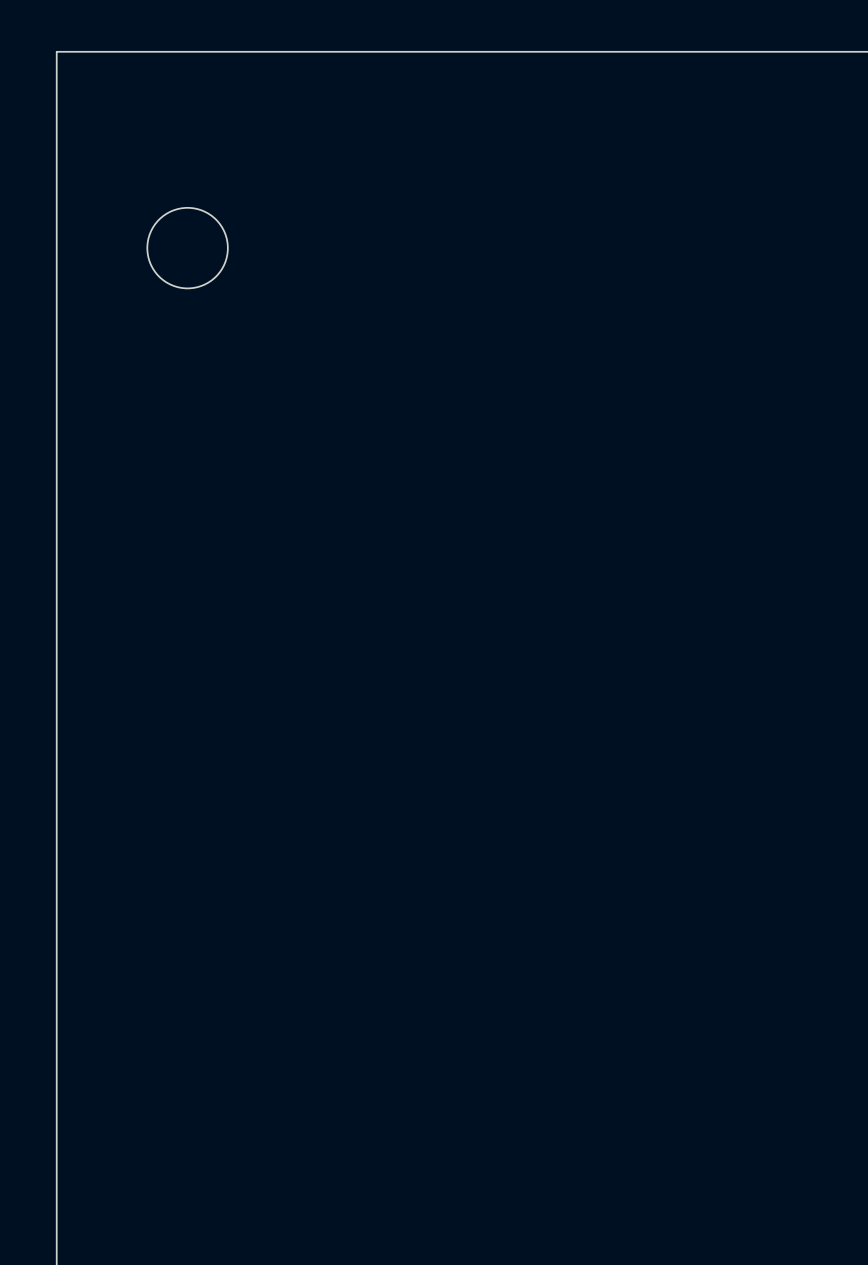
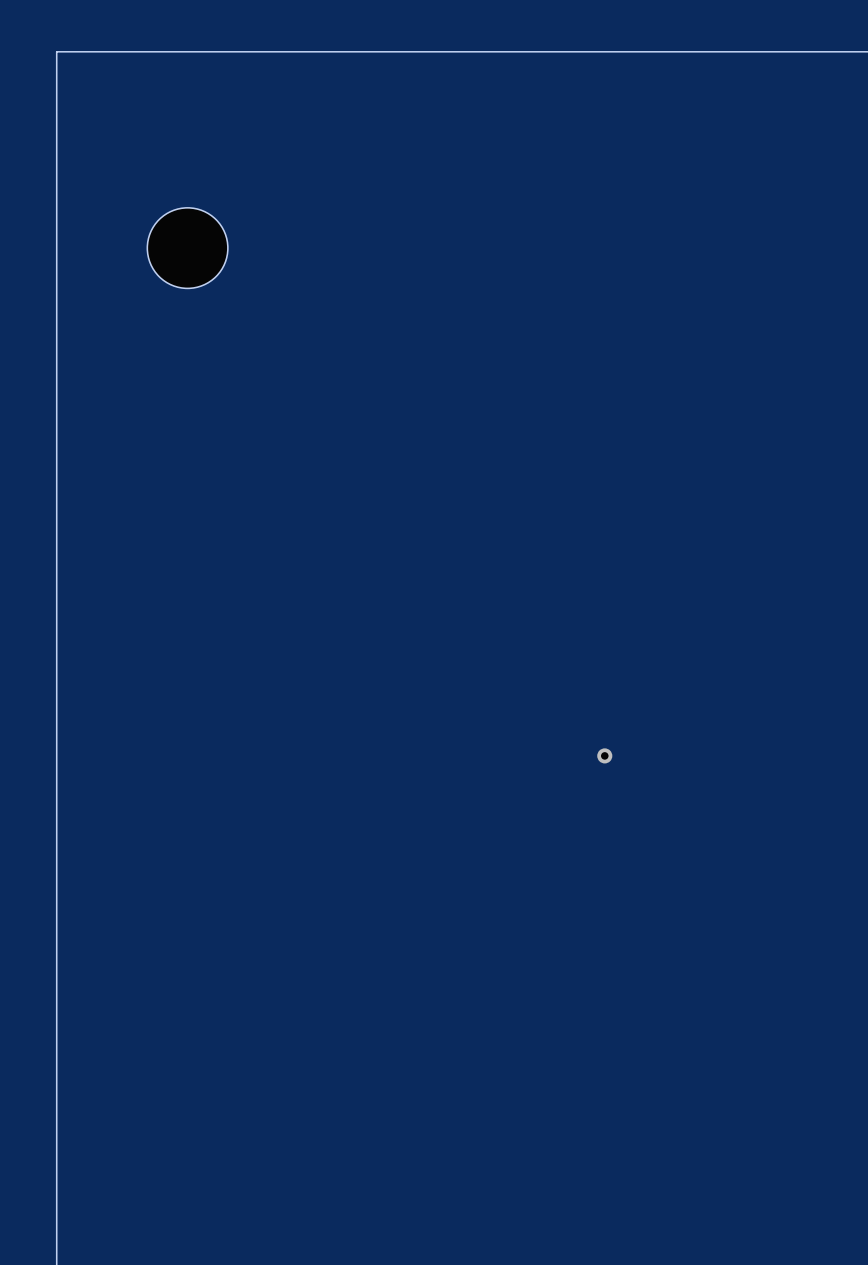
via: none -> (604, 755)

